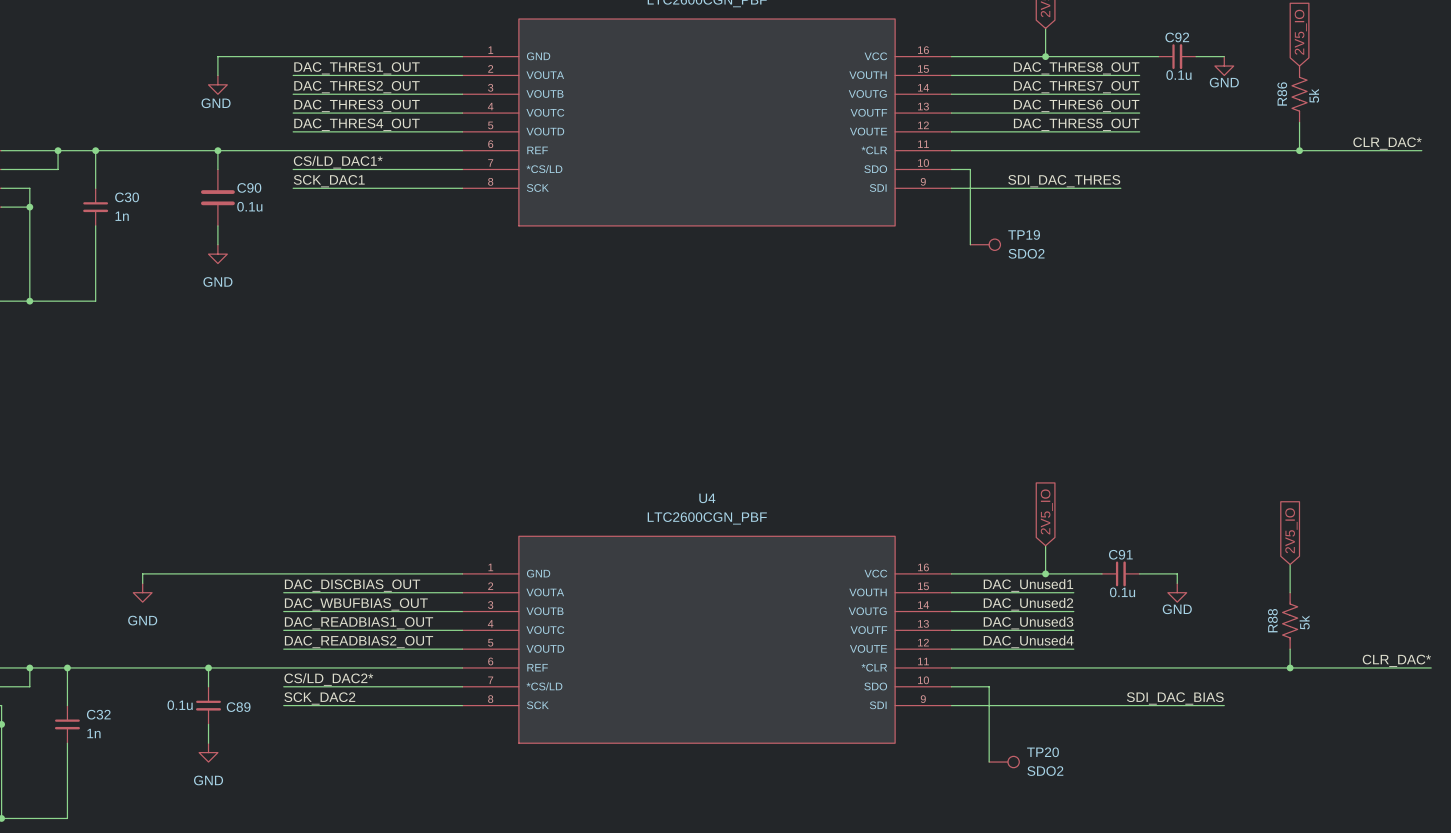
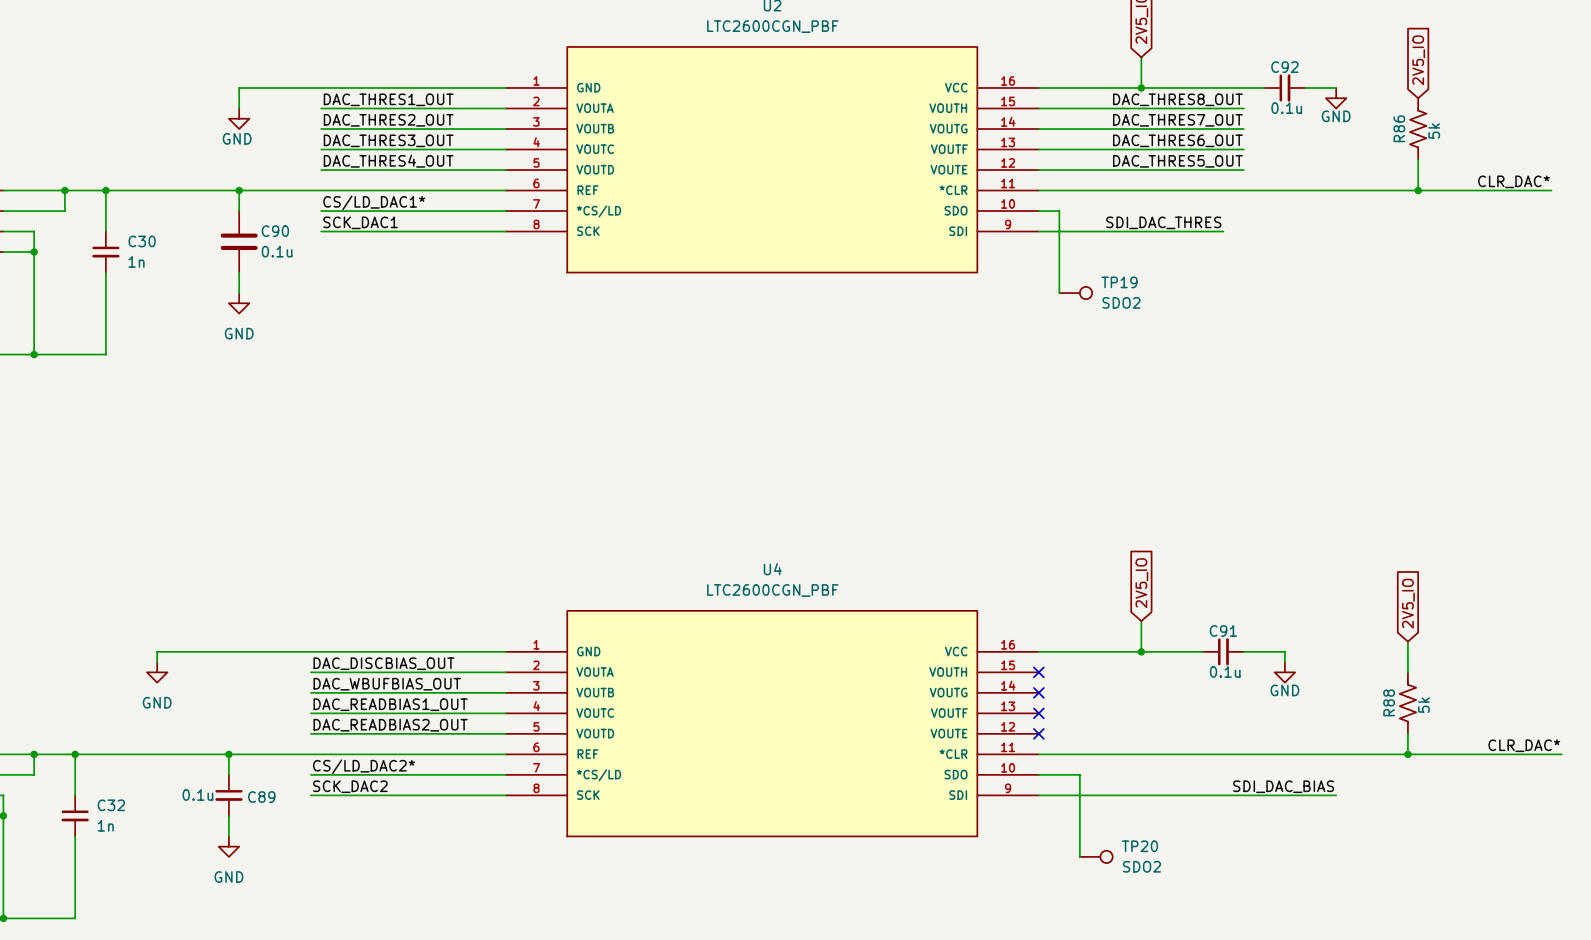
label: DAC_Unused1 (1028, 585) -> none
wire: (951, 592) (1073, 592) -> none
no-connect mark: none -> (1038, 672)
label: DAC_Unused2 (1028, 604) -> none
wire: (951, 611) (1073, 611) -> none
no-connect mark: none -> (1038, 692)
label: DAC_Unused3 (1028, 623) -> none
wire: (951, 630) (1073, 630) -> none
no-connect mark: none -> (1038, 713)
label: DAC_Unused4 (1028, 641) -> none
wire: (951, 649) (1073, 649) -> none
no-connect mark: none -> (1038, 733)

